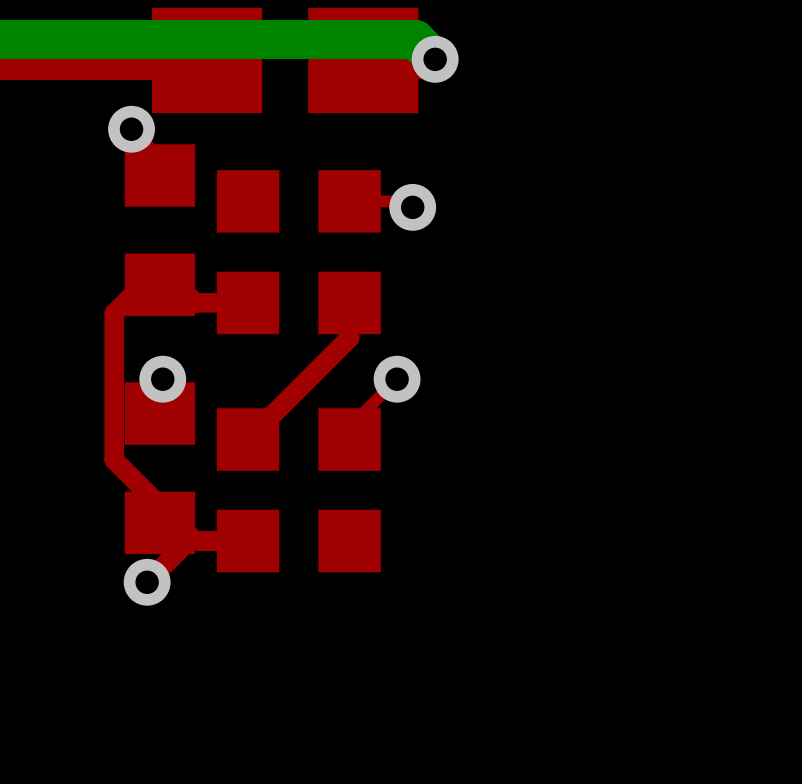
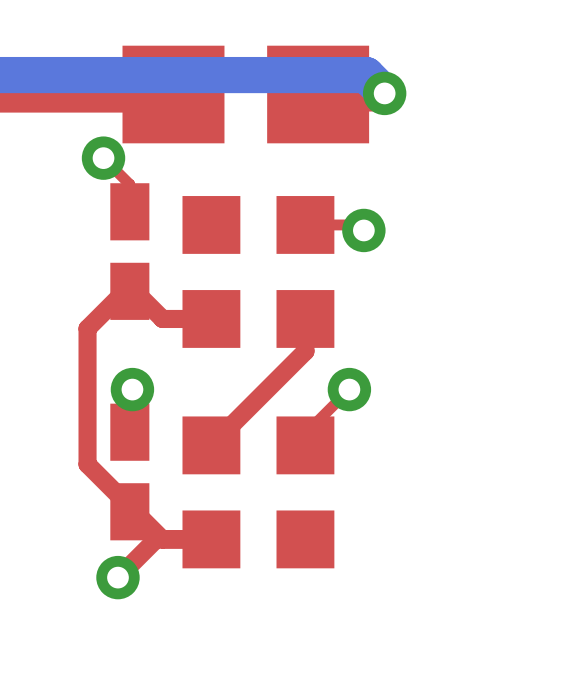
part footprint: [124, 144, 196, 317] -> [110, 183, 150, 320]
part footprint: [124, 382, 196, 555] -> [110, 403, 150, 541]

